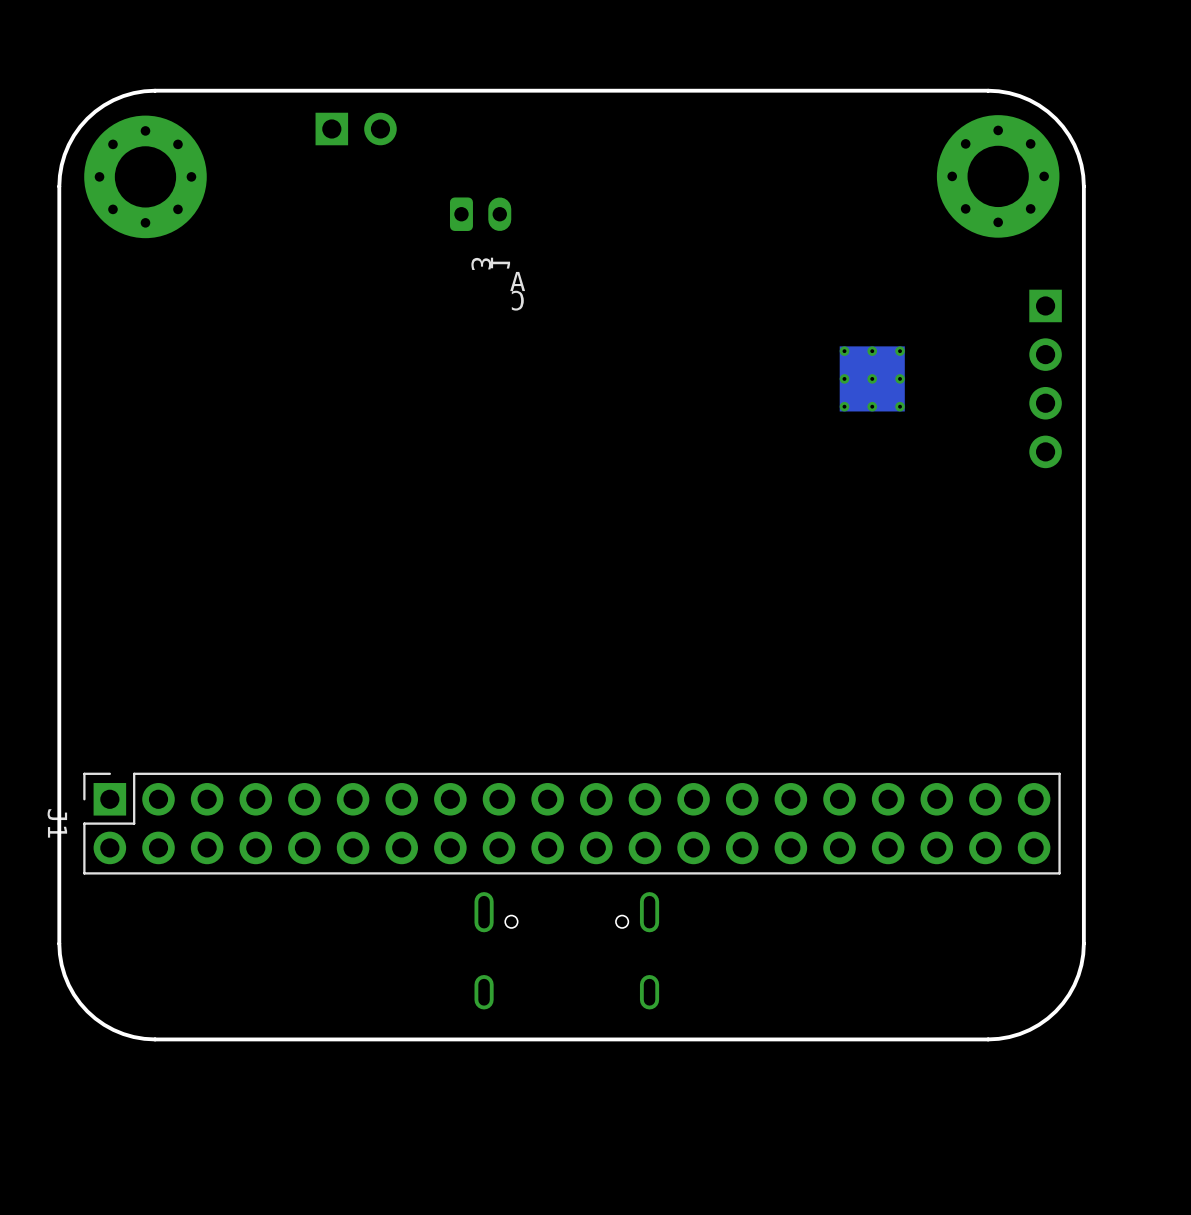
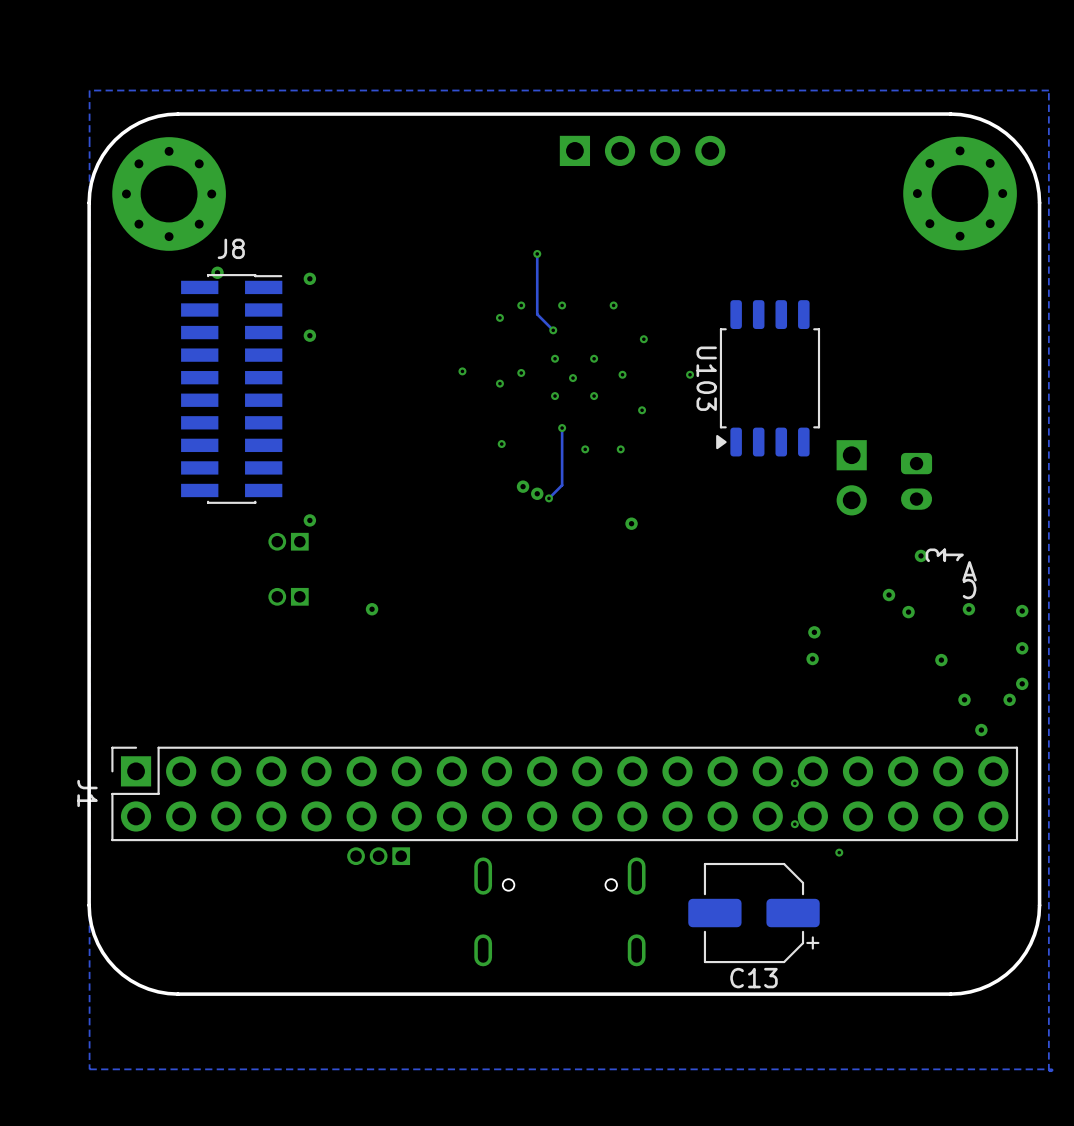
zone outline: none -> (1048, 90) (1048, 1071) (1052, 1071) (1052, 1069) (89, 1069) (89, 90) (1048, 90)
part: (356, 129) -> none
part: (480, 214) -> none
track: none -> (537, 253) (537, 314) (553, 330)
via: none -> (537, 253)
via: none -> (217, 272)
via: none -> (309, 278)
part: (498, 284) -> none
via: none -> (521, 305)
via: none -> (562, 305)
via: none -> (613, 305)
via: none -> (499, 317)
via: none -> (553, 330)
via: none -> (309, 335)
via: none -> (643, 339)
via: none -> (555, 358)
via: none -> (594, 358)
via: none -> (462, 371)
via: none -> (521, 372)
via: none -> (622, 374)
via: none -> (690, 374)
via: none -> (573, 378)
U103: none -> (768, 378)
part: (872, 378) -> none
part rotation: 0° (1045, 378) -> 90° counterclockwise (642, 150)
part position: (1045, 378) -> (642, 150)
via: none -> (499, 383)
J8: none -> (231, 388)
via: none -> (555, 396)
via: none -> (594, 396)
via: none -> (642, 410)
track: none -> (562, 428) (562, 485) (548, 498)
via: none -> (562, 428)
via: none -> (501, 444)
via: none -> (585, 449)
via: none -> (620, 449)
part: none -> (851, 477)
part: none -> (916, 481)
via: none -> (523, 486)
via: none -> (537, 493)
via: none -> (548, 498)
via: none -> (309, 520)
via: none -> (631, 523)
part: none -> (288, 541)
via: none -> (920, 555)
part: none -> (951, 573)
via: none -> (889, 595)
part: none -> (288, 596)
via: none -> (372, 609)
via: none -> (968, 609)
via: none -> (1022, 611)
via: none -> (908, 612)
via: none -> (814, 632)
via: none -> (1022, 648)
via: none -> (812, 658)
via: none -> (941, 660)
via: none -> (1022, 683)
via: none -> (964, 699)
via: none -> (1009, 699)
via: none -> (981, 730)
via: none -> (794, 783)
via: none -> (794, 824)
via: none -> (839, 852)
part: none -> (378, 856)
C13: none -> (753, 913)

